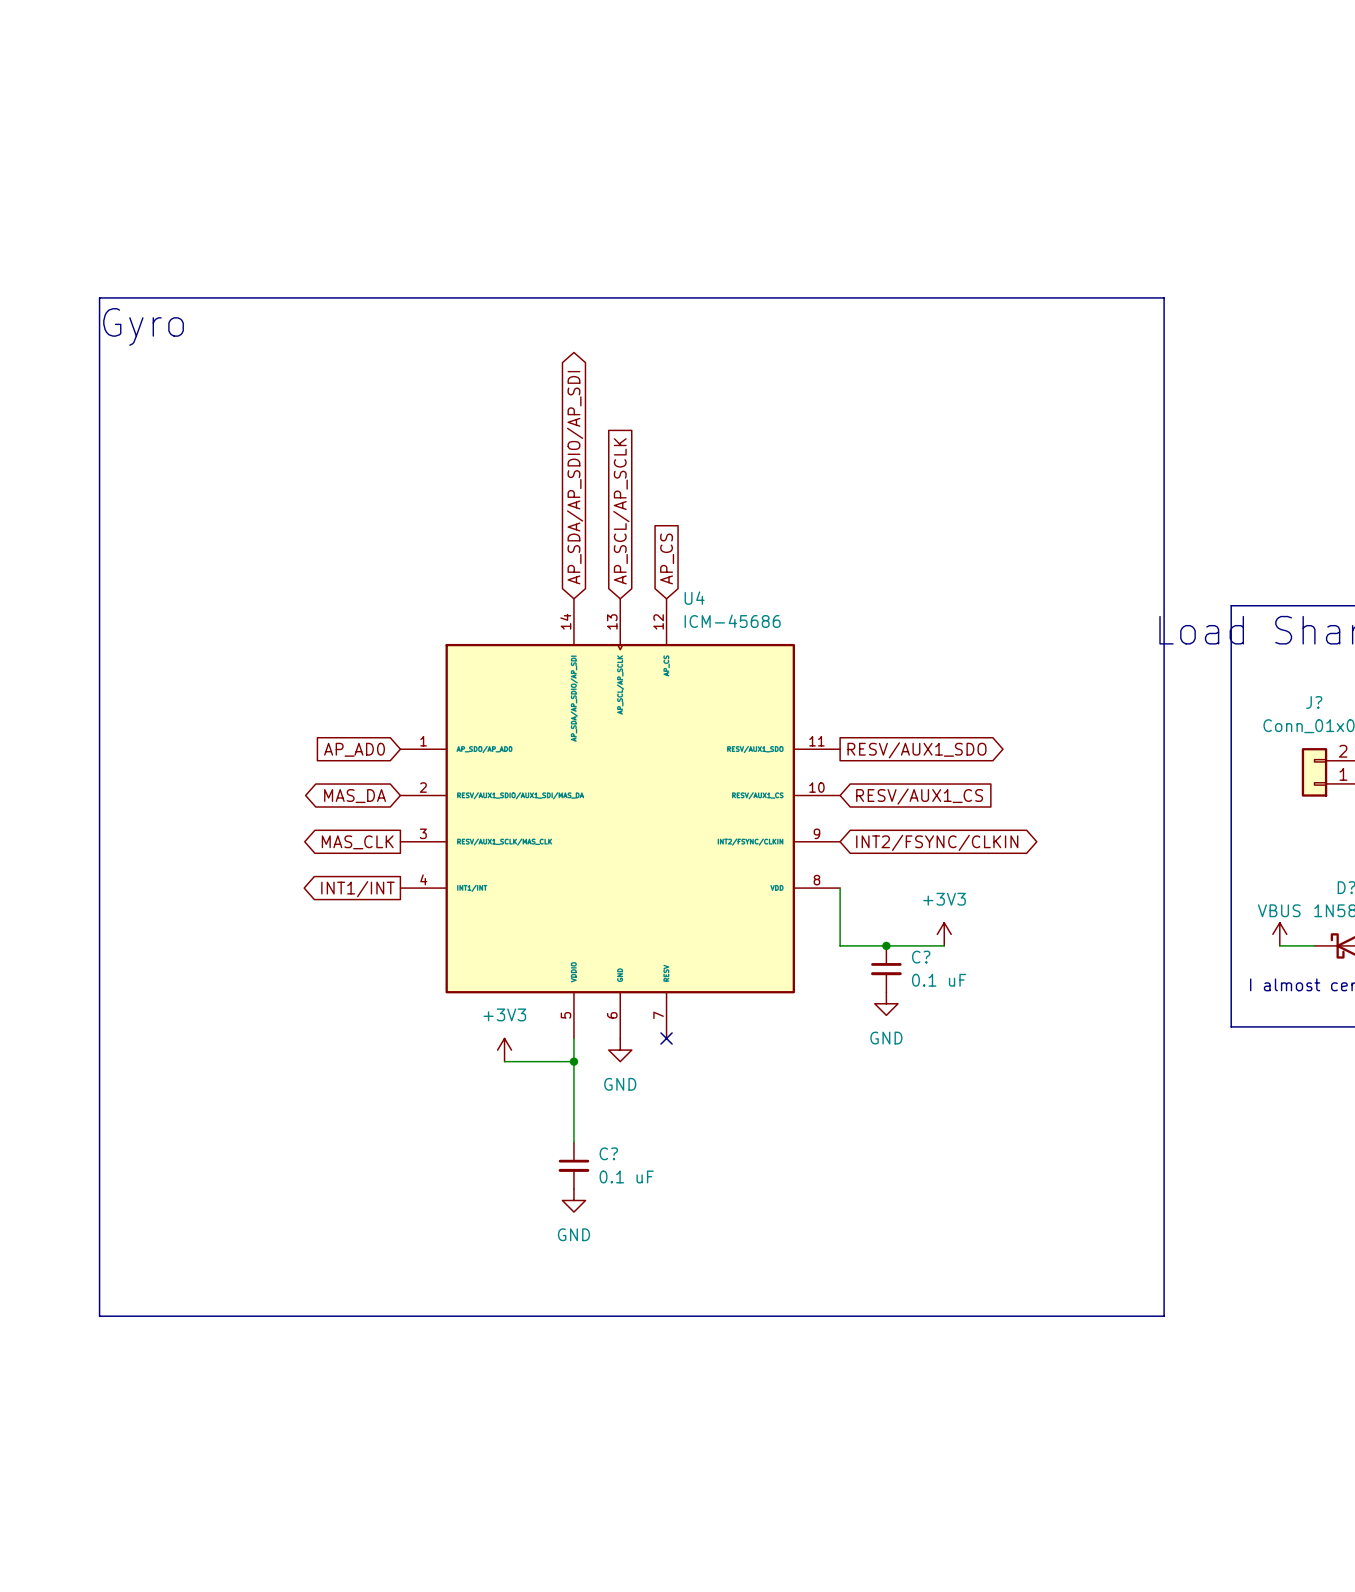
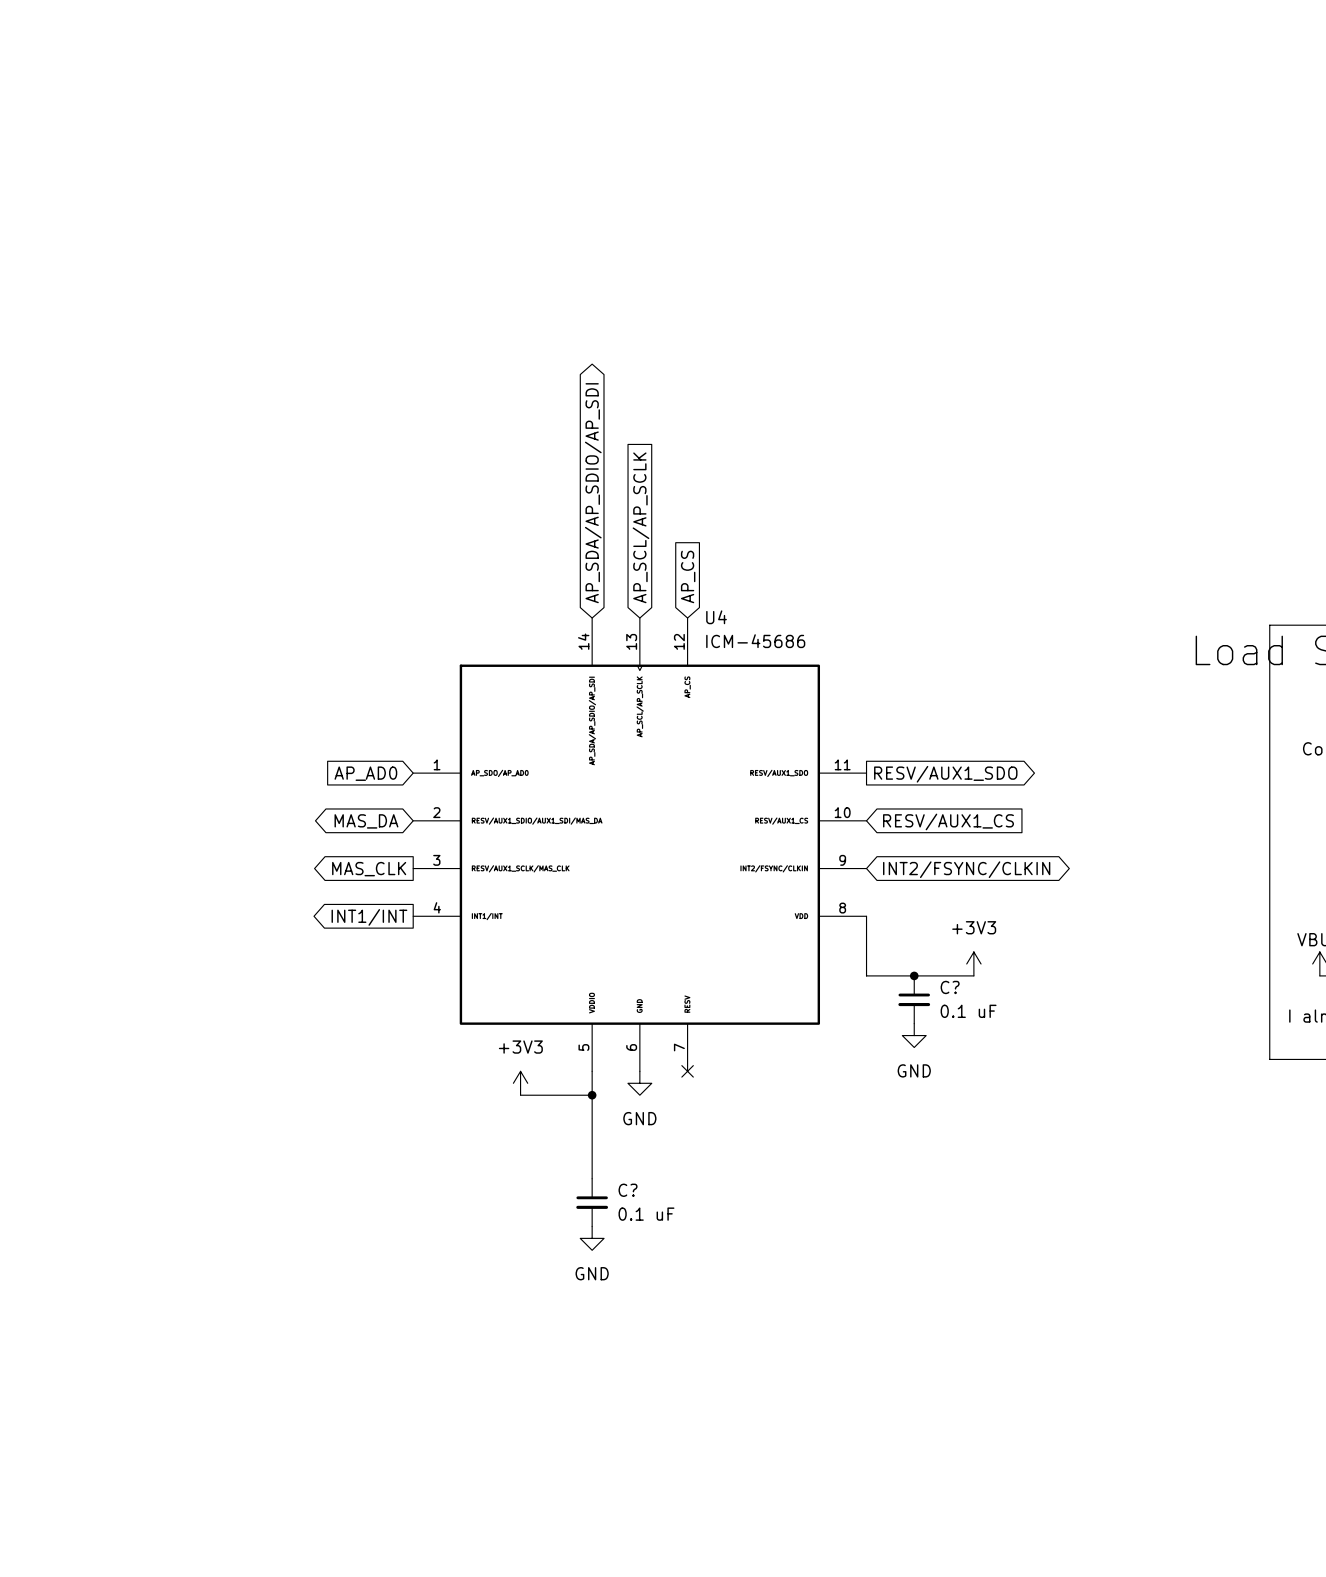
line: (99, 297) (1164, 297) (1164, 1316) (99, 1316) (99, 297) -> none
text: Gyro (143, 326) -> none

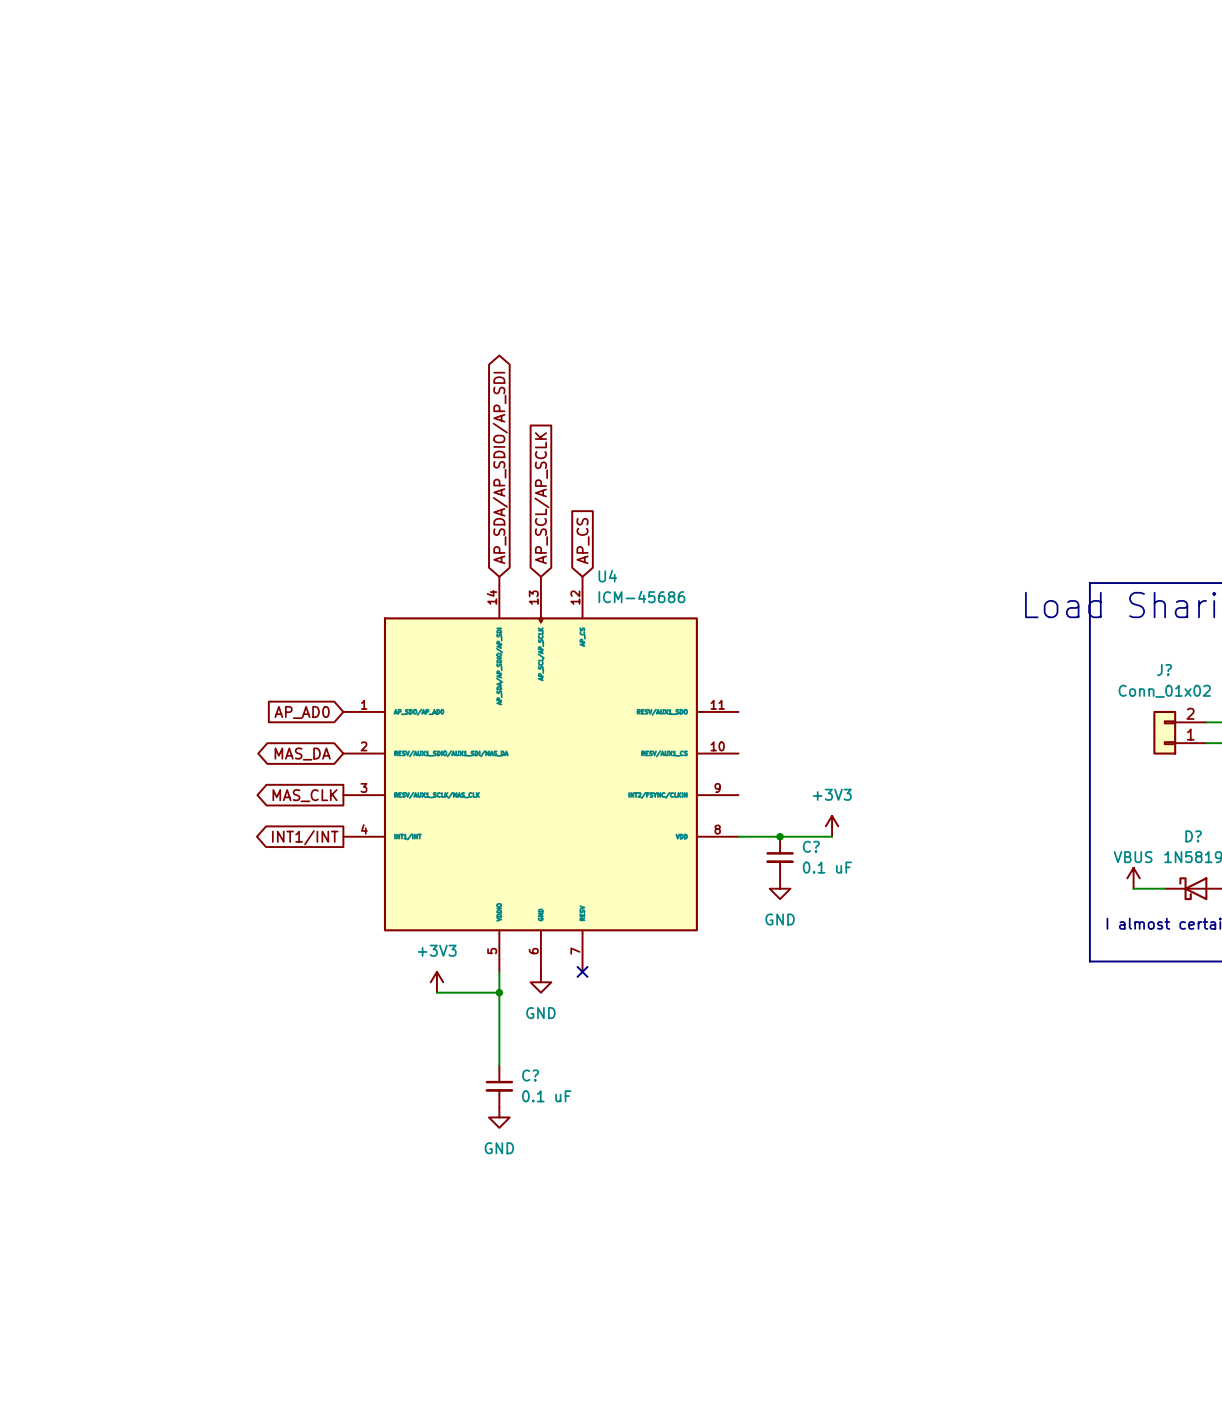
global label: RESV/AUX1_SDO (945, 774) -> none
global label: RESV/AUX1_CS (948, 821) -> none
global label: INT2/FSYNC/CLKIN (966, 869) -> none
wire: (866, 916) (866, 975) (973, 975) -> (738, 836) (832, 836)
junction: none -> (780, 836)
power symbol position: +3V3 (973, 963) -> +3V3 (832, 826)
junction: (914, 975) -> none
C? position: (914, 999) -> (780, 857)
power symbol position: GND (914, 1035) -> GND (780, 888)

